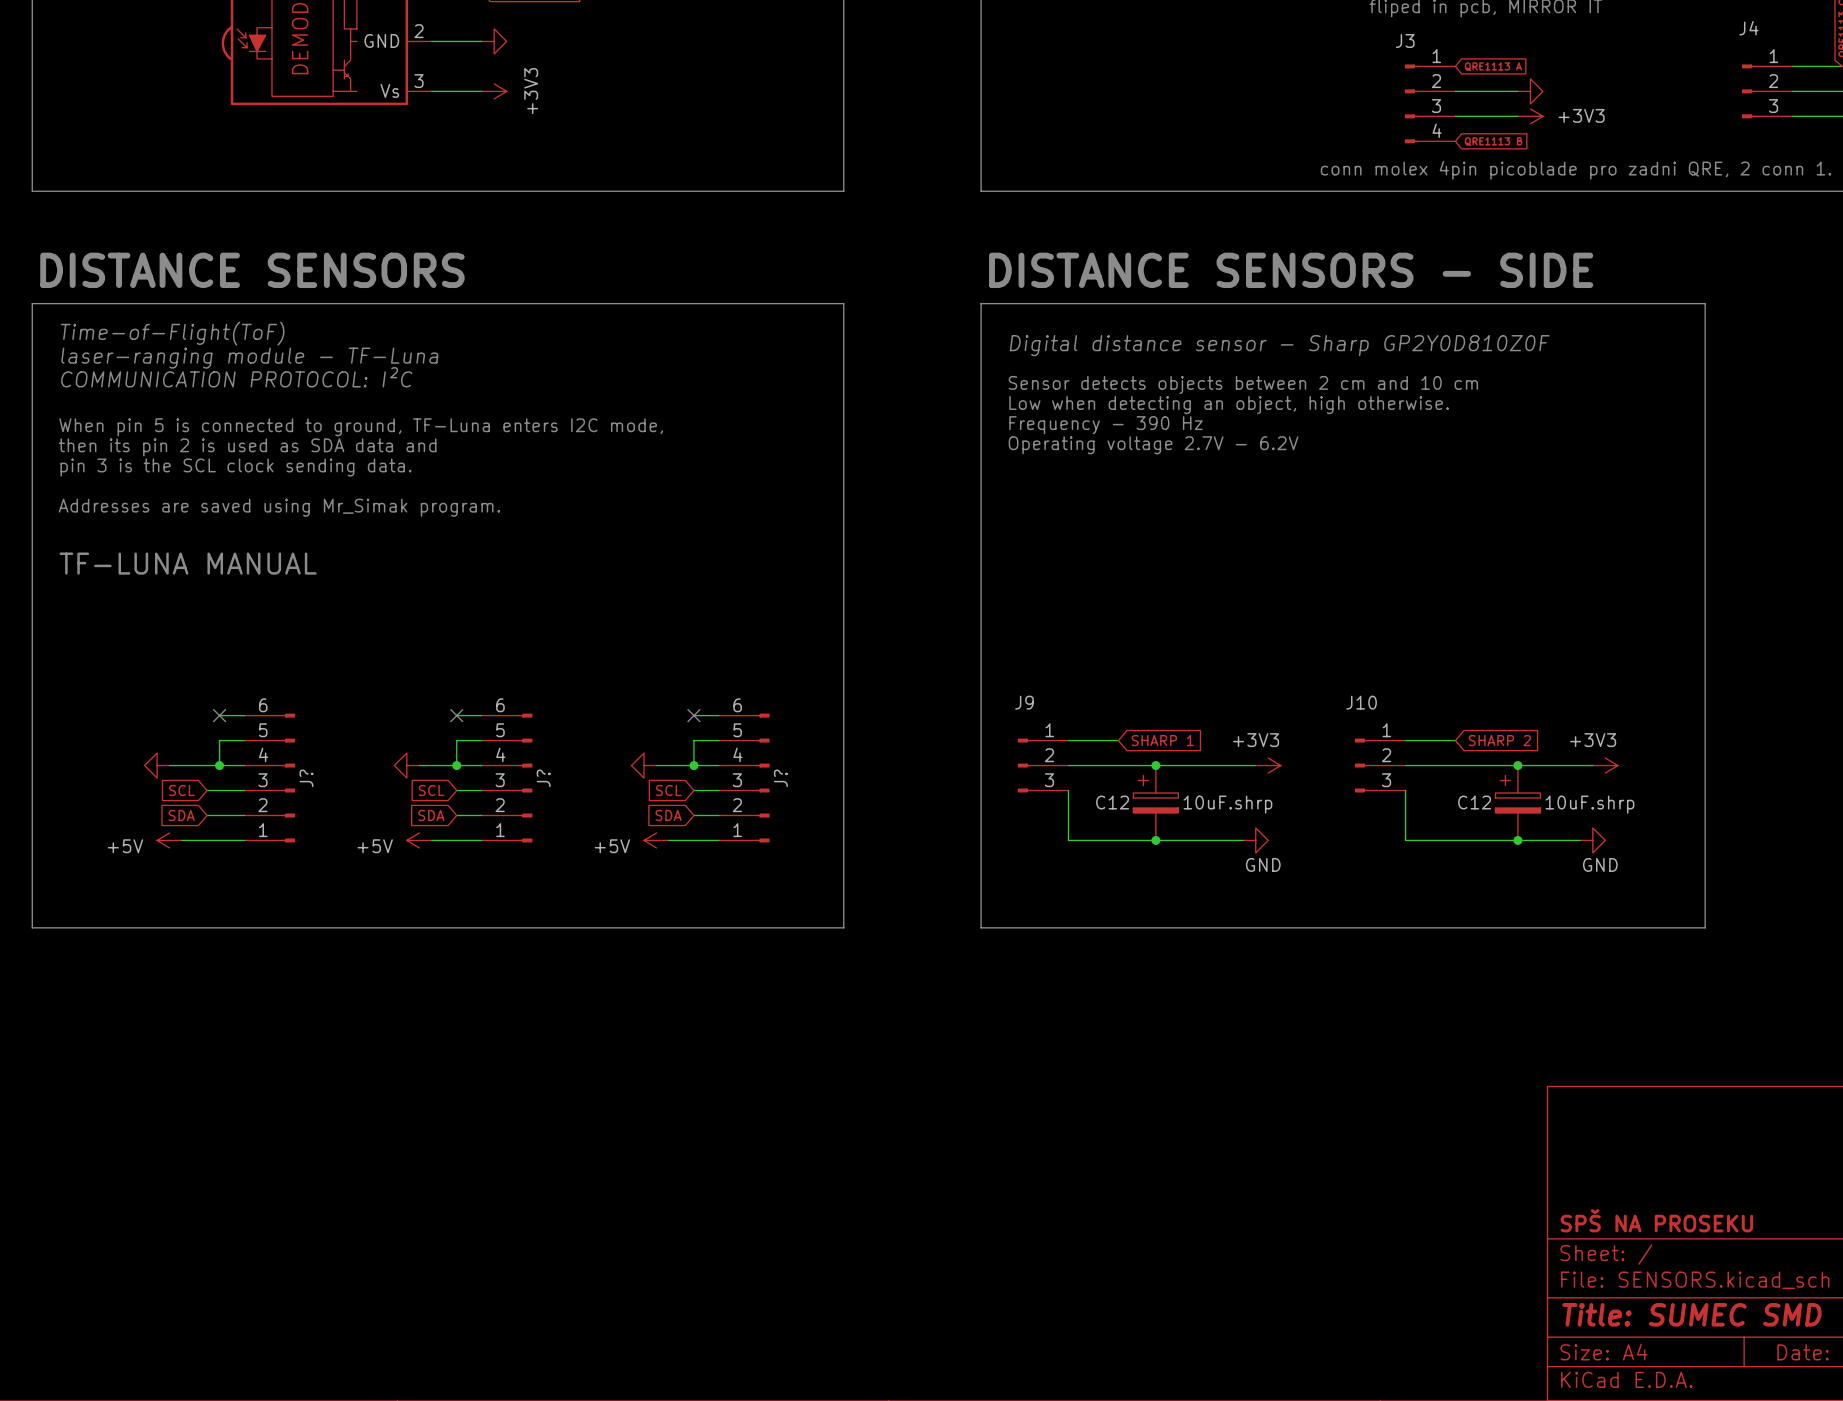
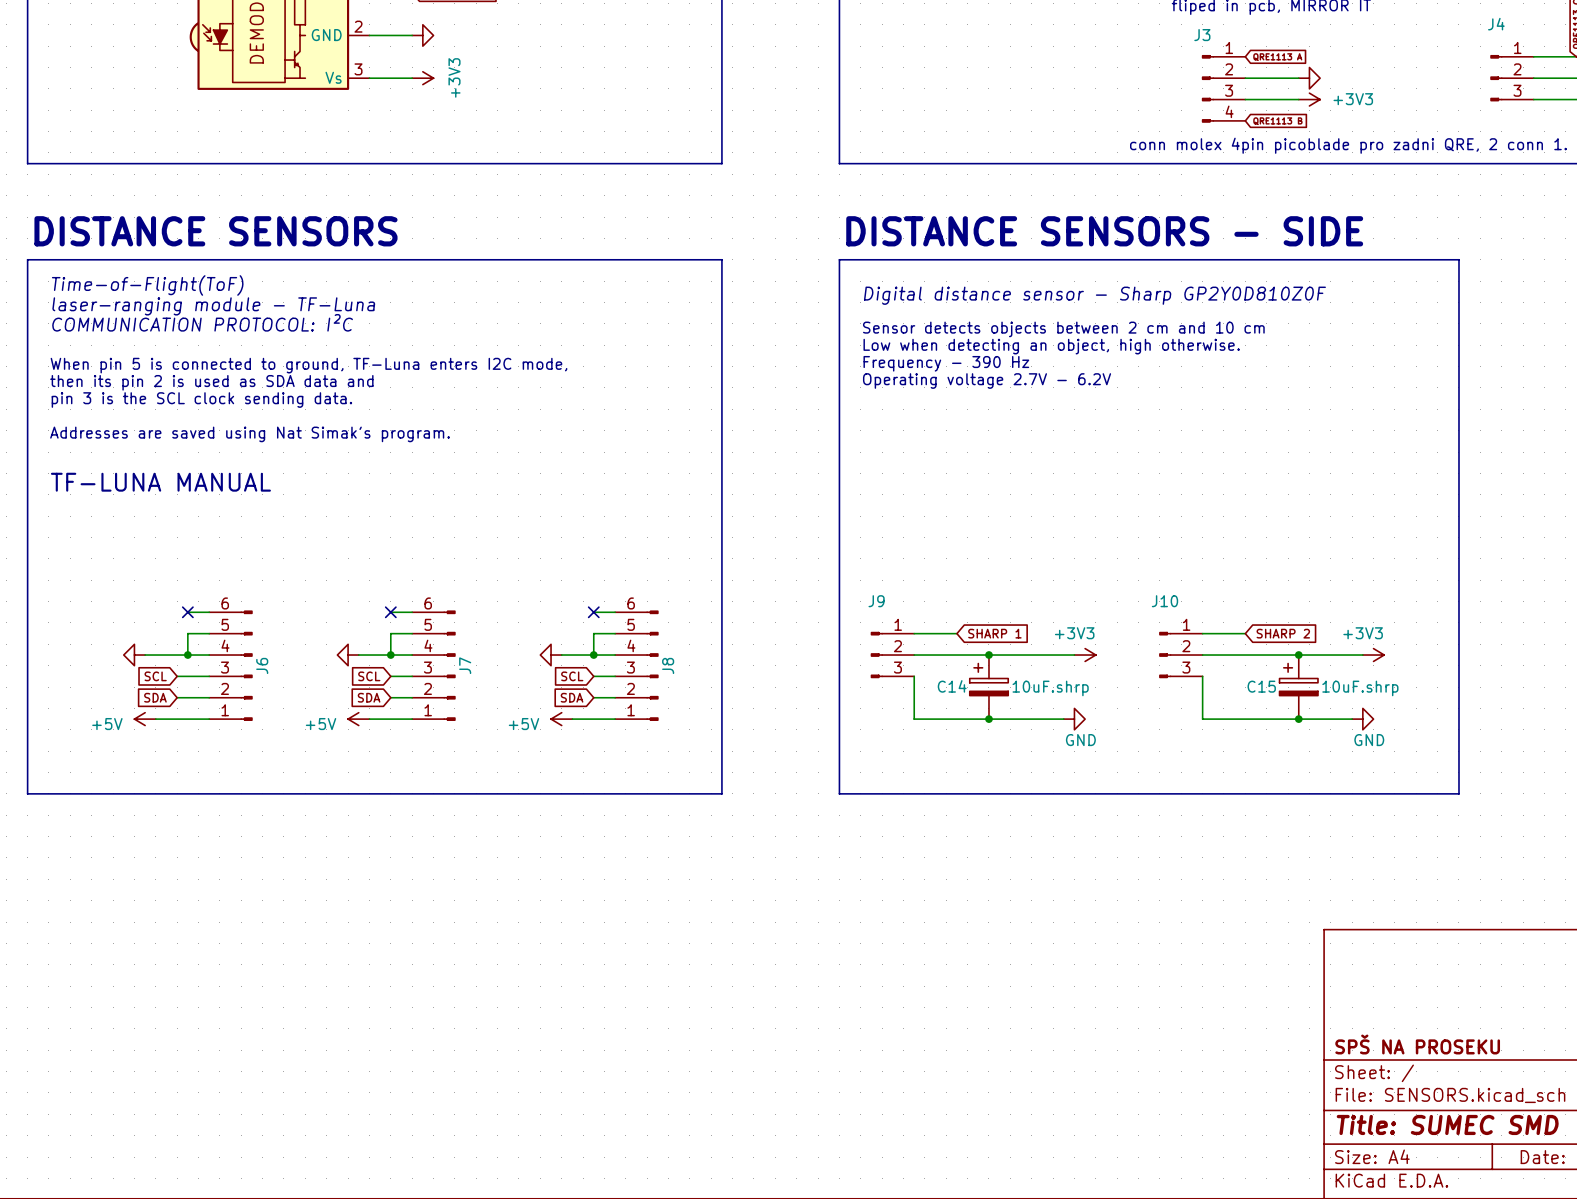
text: Addresses are saved using Mr_Simak program. (279, 507) -> Addresses are saved using Nat Simak's program. (249, 434)
J? name: J? (306, 778) -> J6 (262, 665)
J? name: J? (543, 778) -> J7 (465, 665)
J? name: J? (780, 778) -> J8 (668, 665)
C12 name: C12 (1112, 802) -> C14 (952, 686)
C12 name: C12 (1474, 802) -> C15 (1261, 686)

